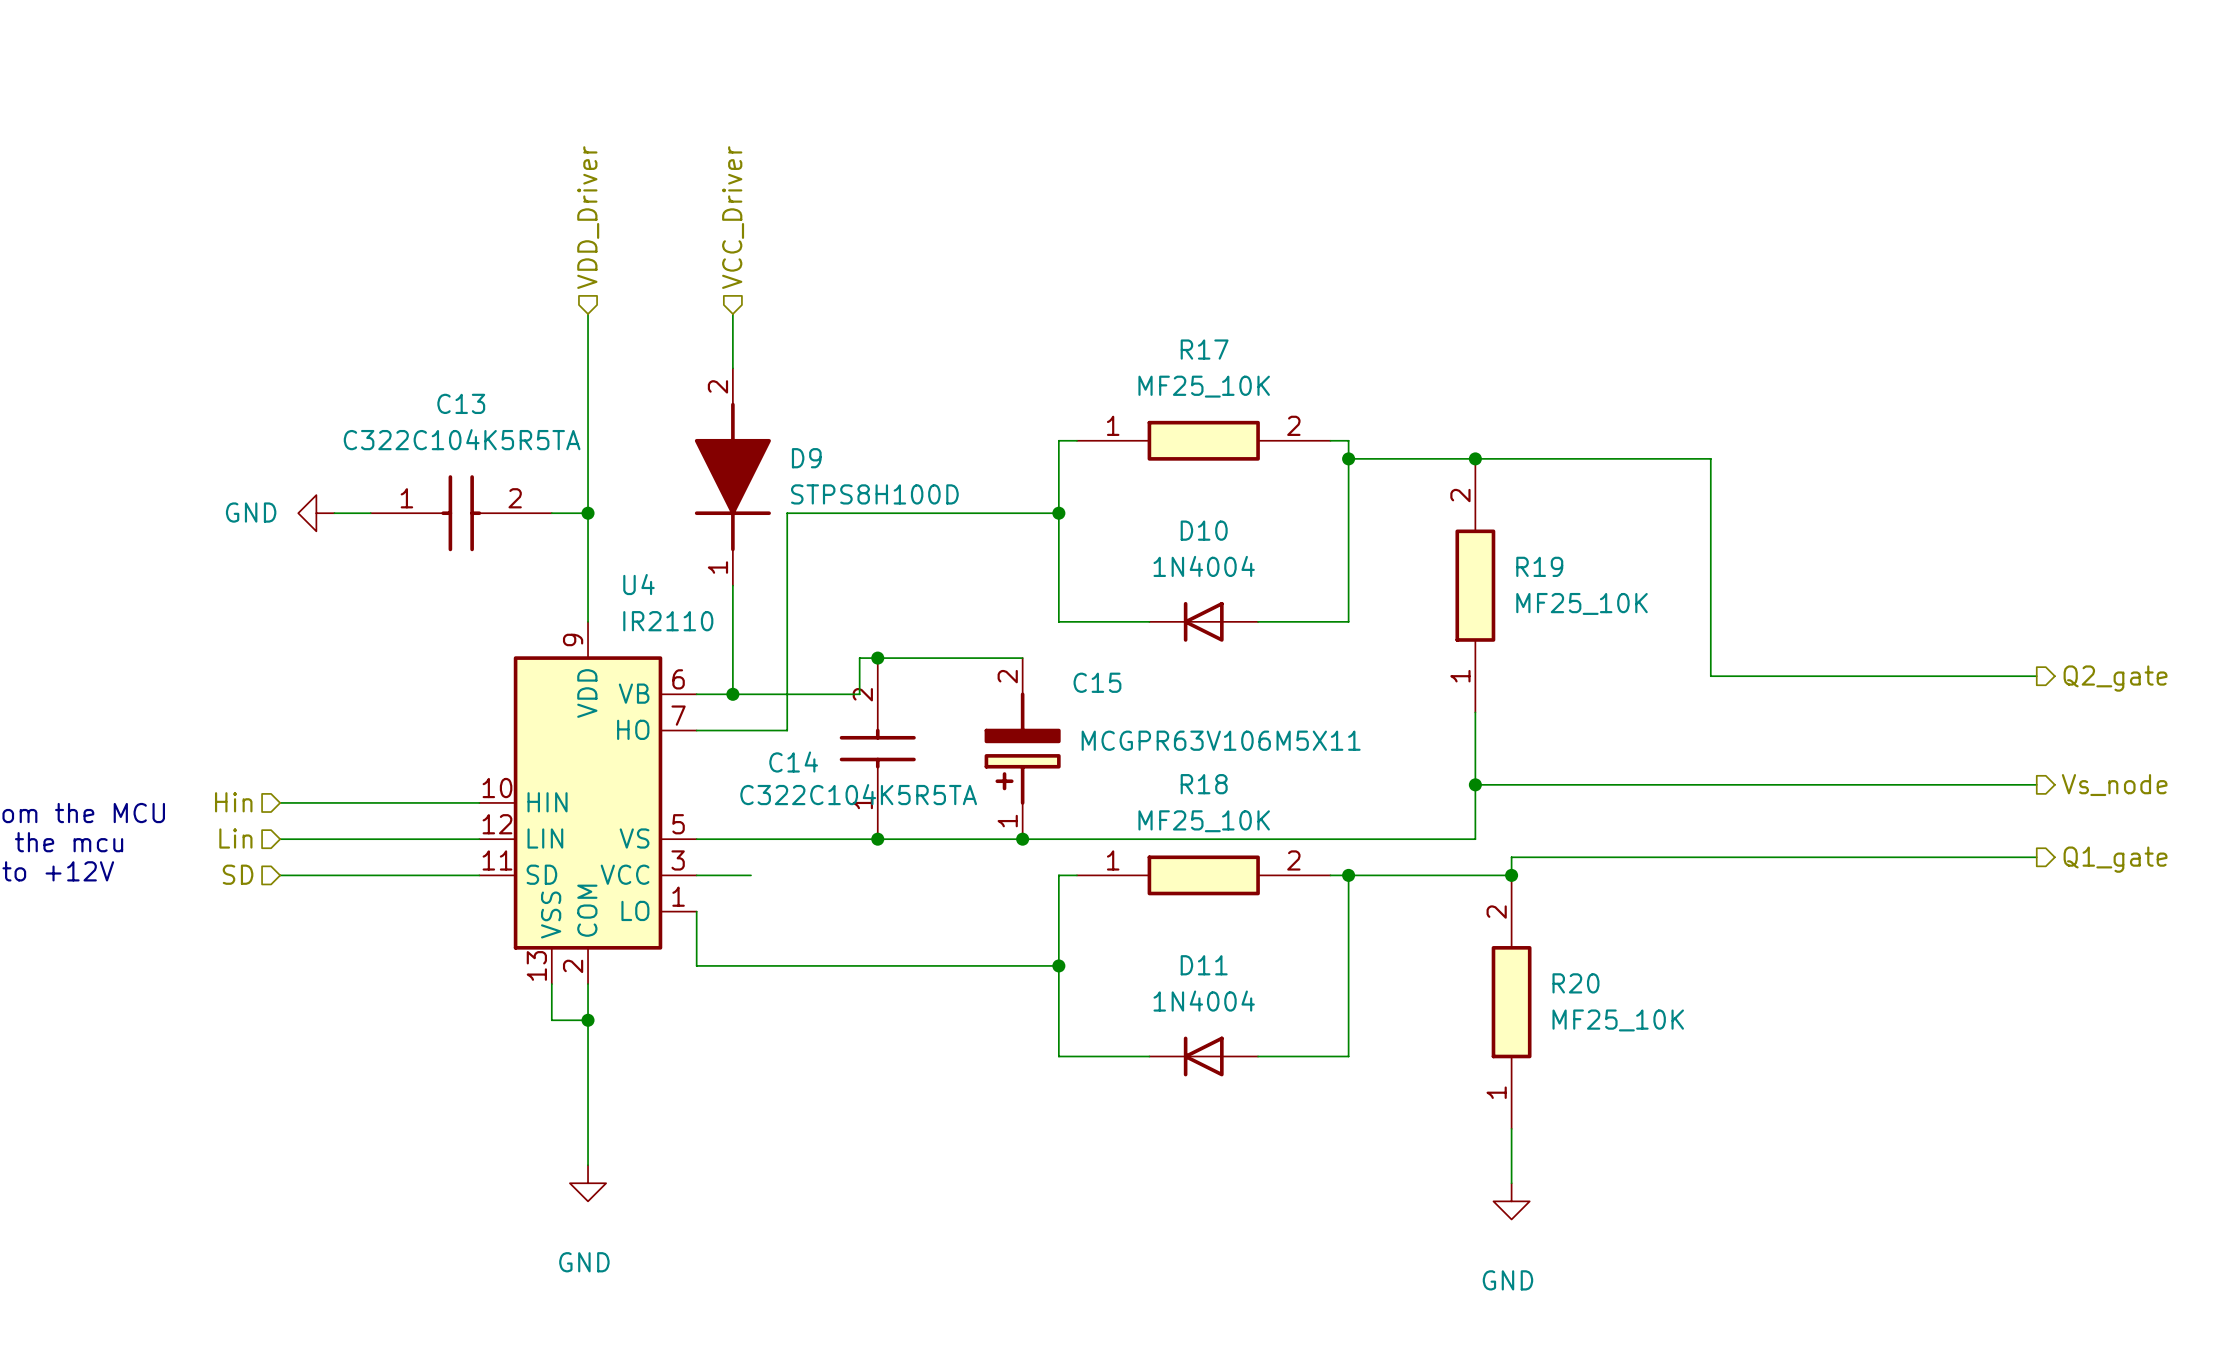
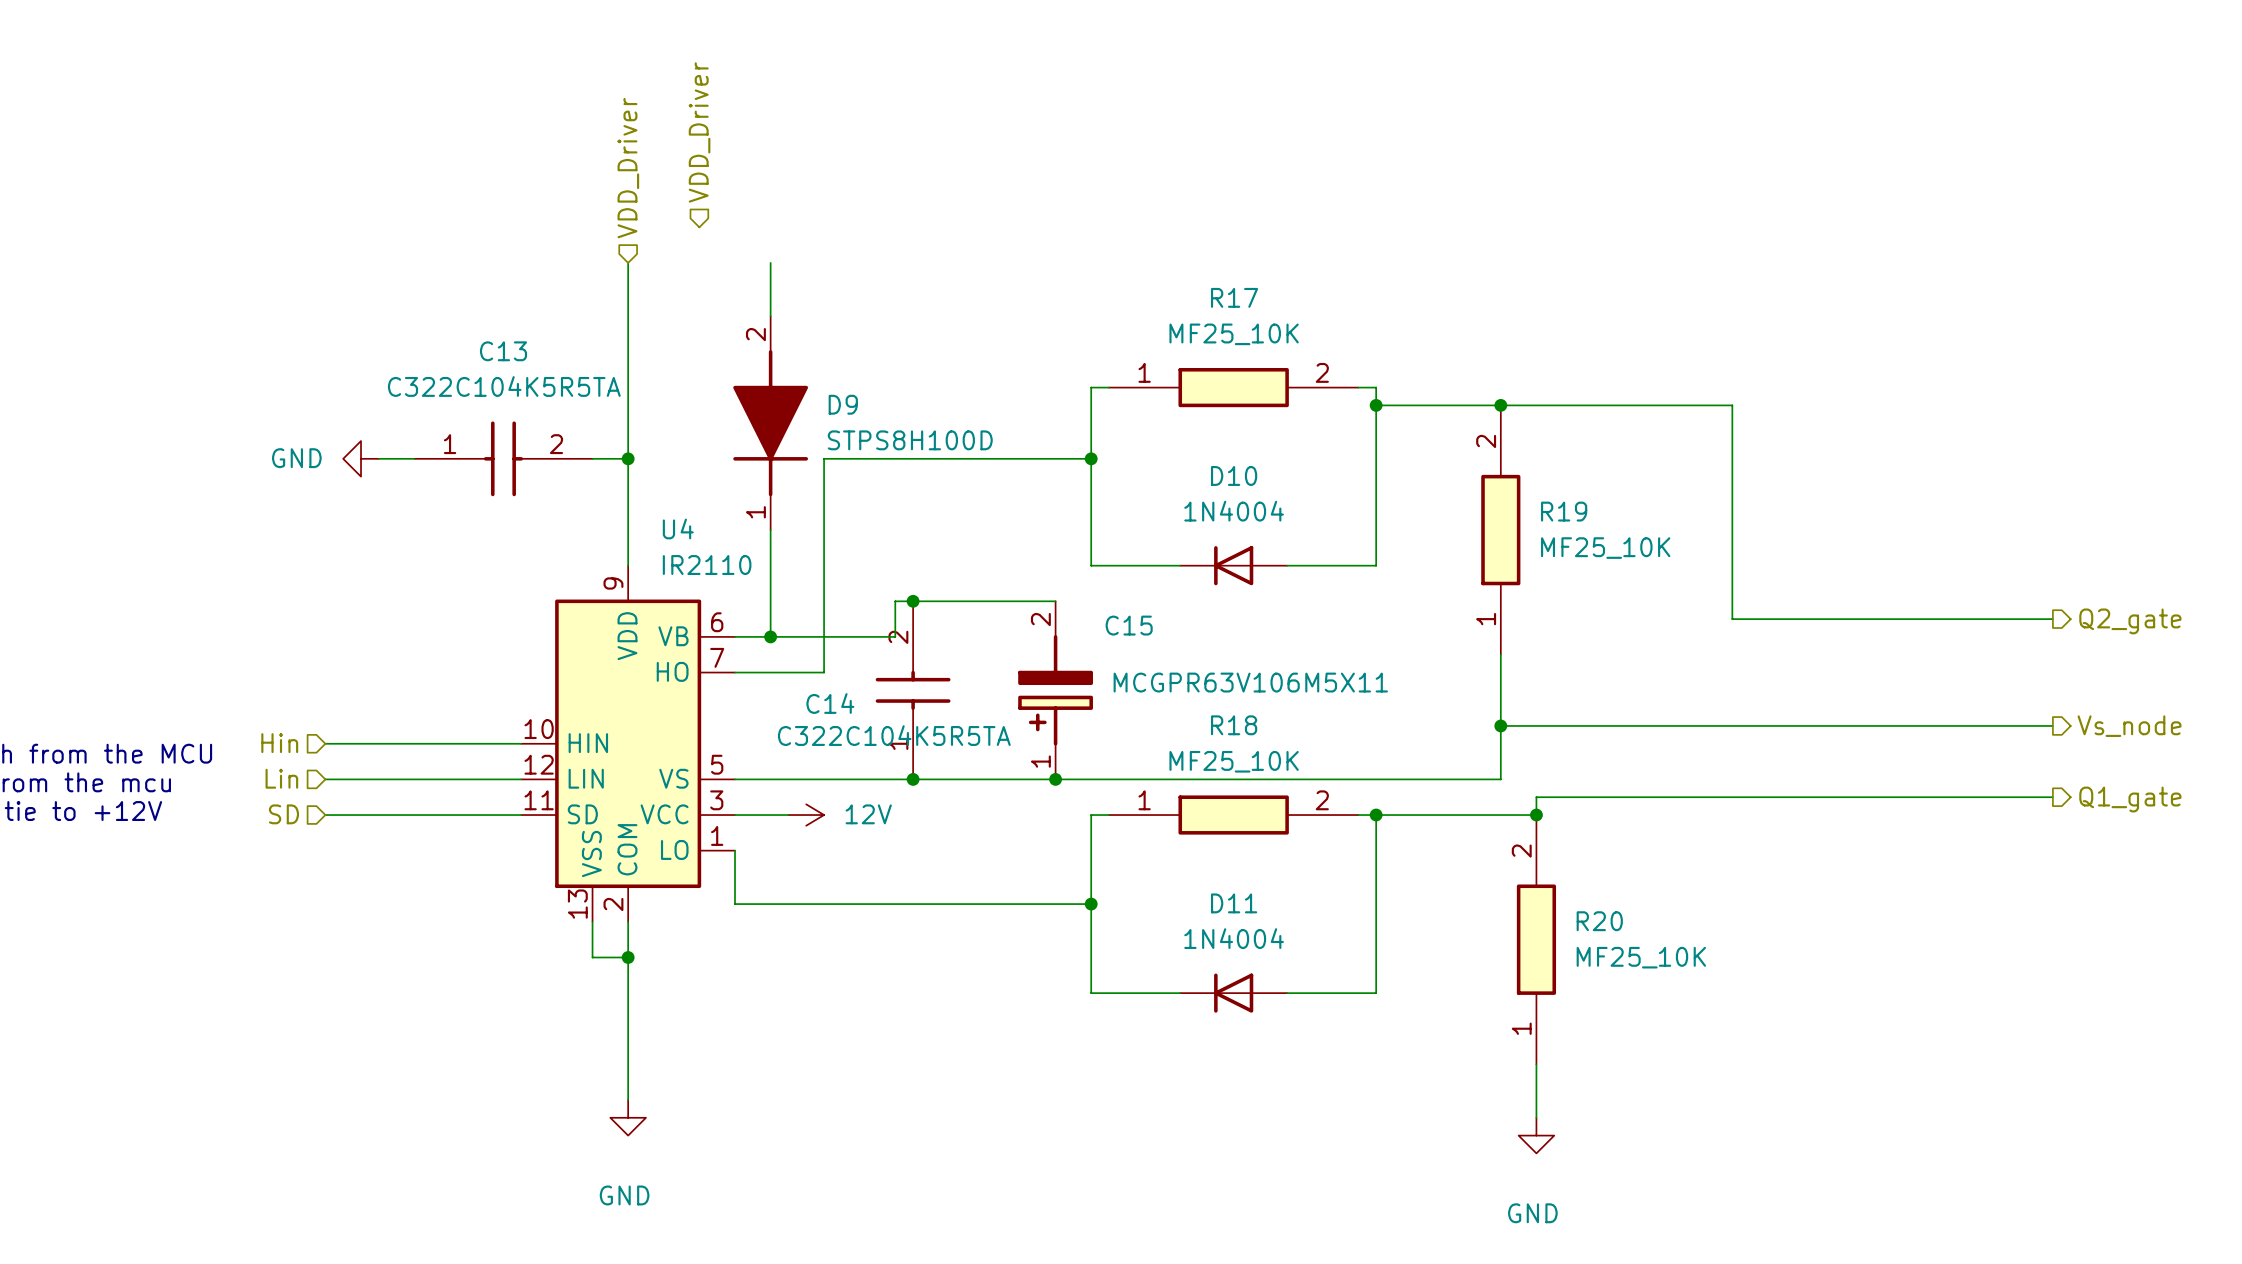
hierarchical label: none -> VDD_Driver (699, 132)
hierarchical label: VCC_Driver (733, 217) -> none
power symbol: none -> 12V (806, 815)

